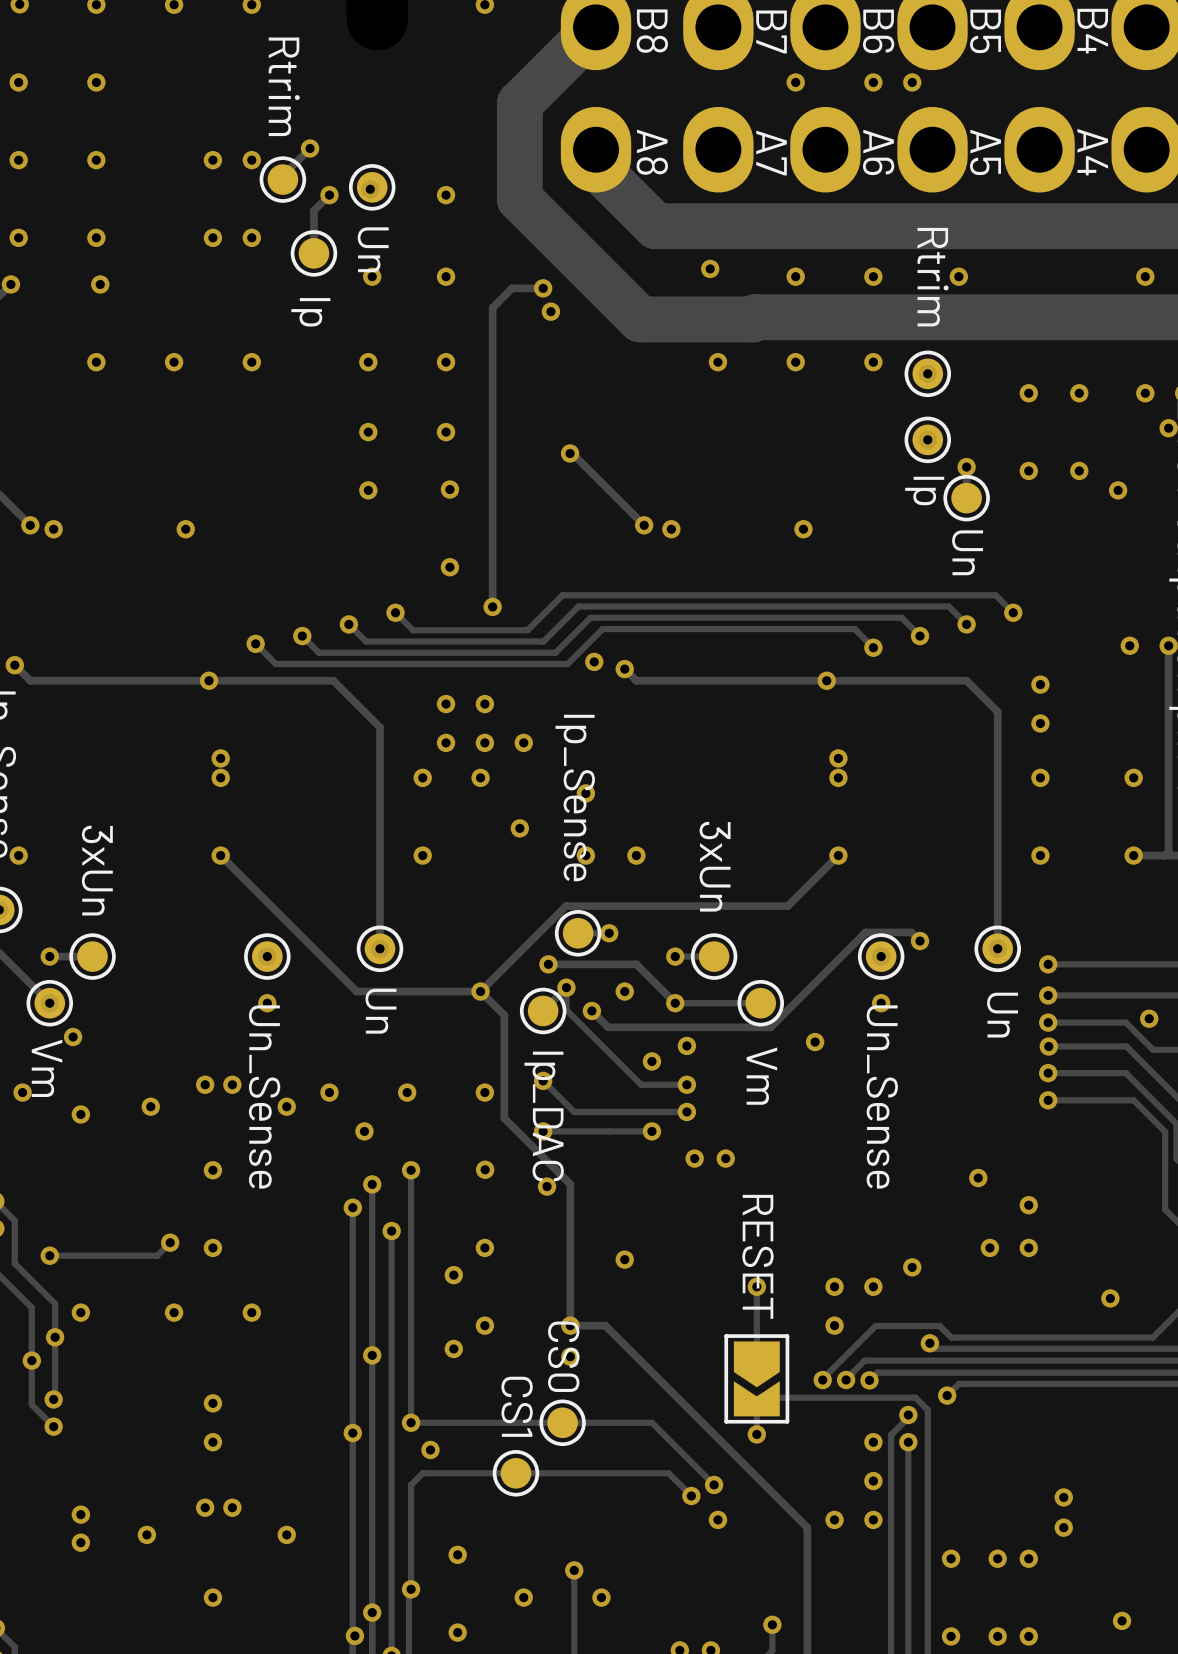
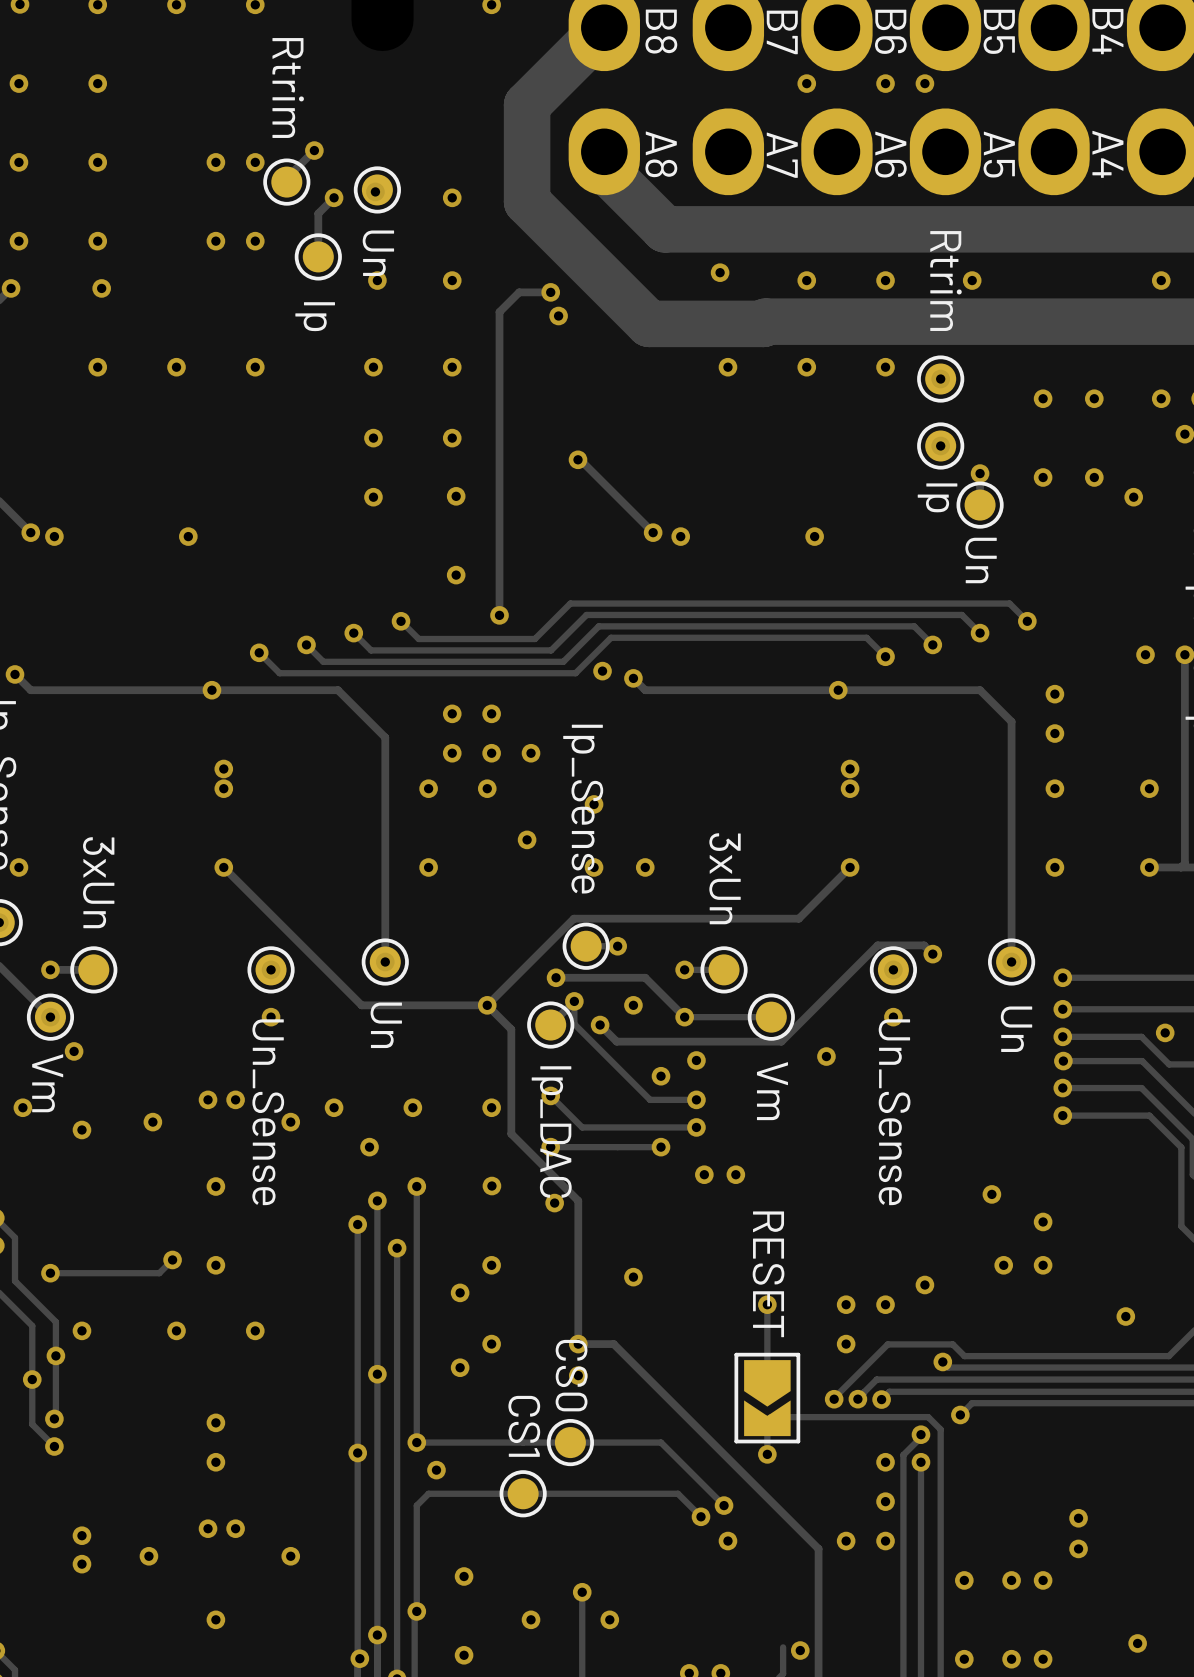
via position: (772, 1624) -> (800, 1650)

